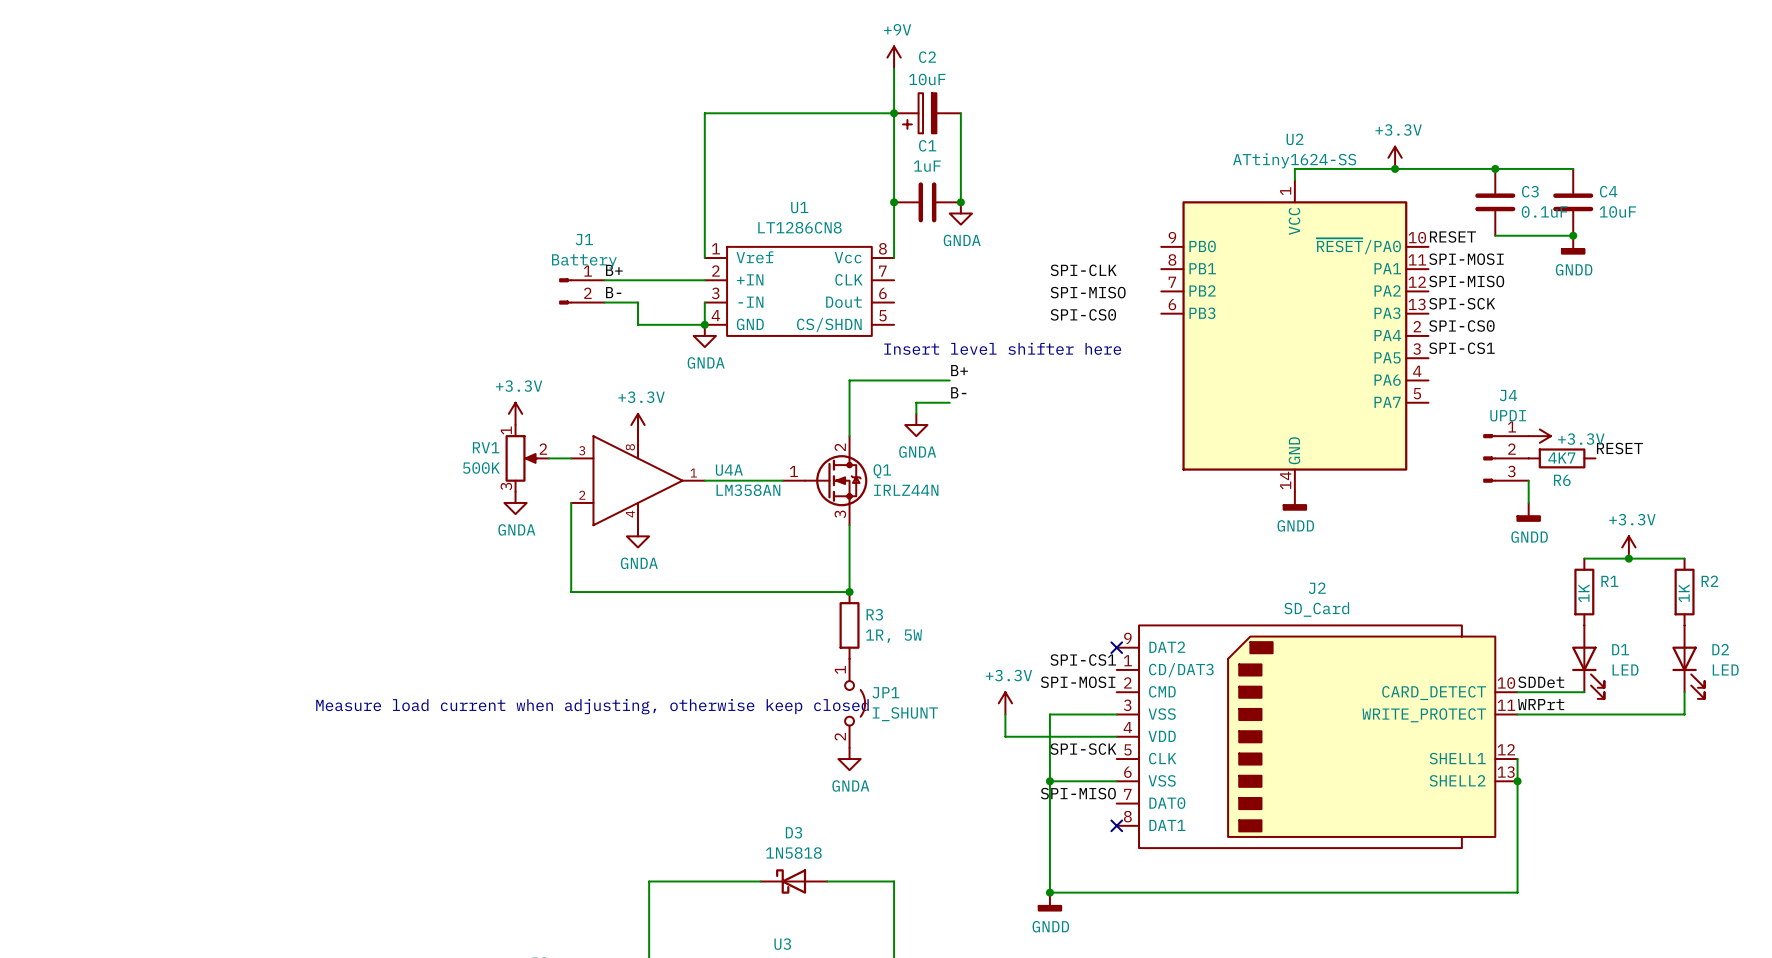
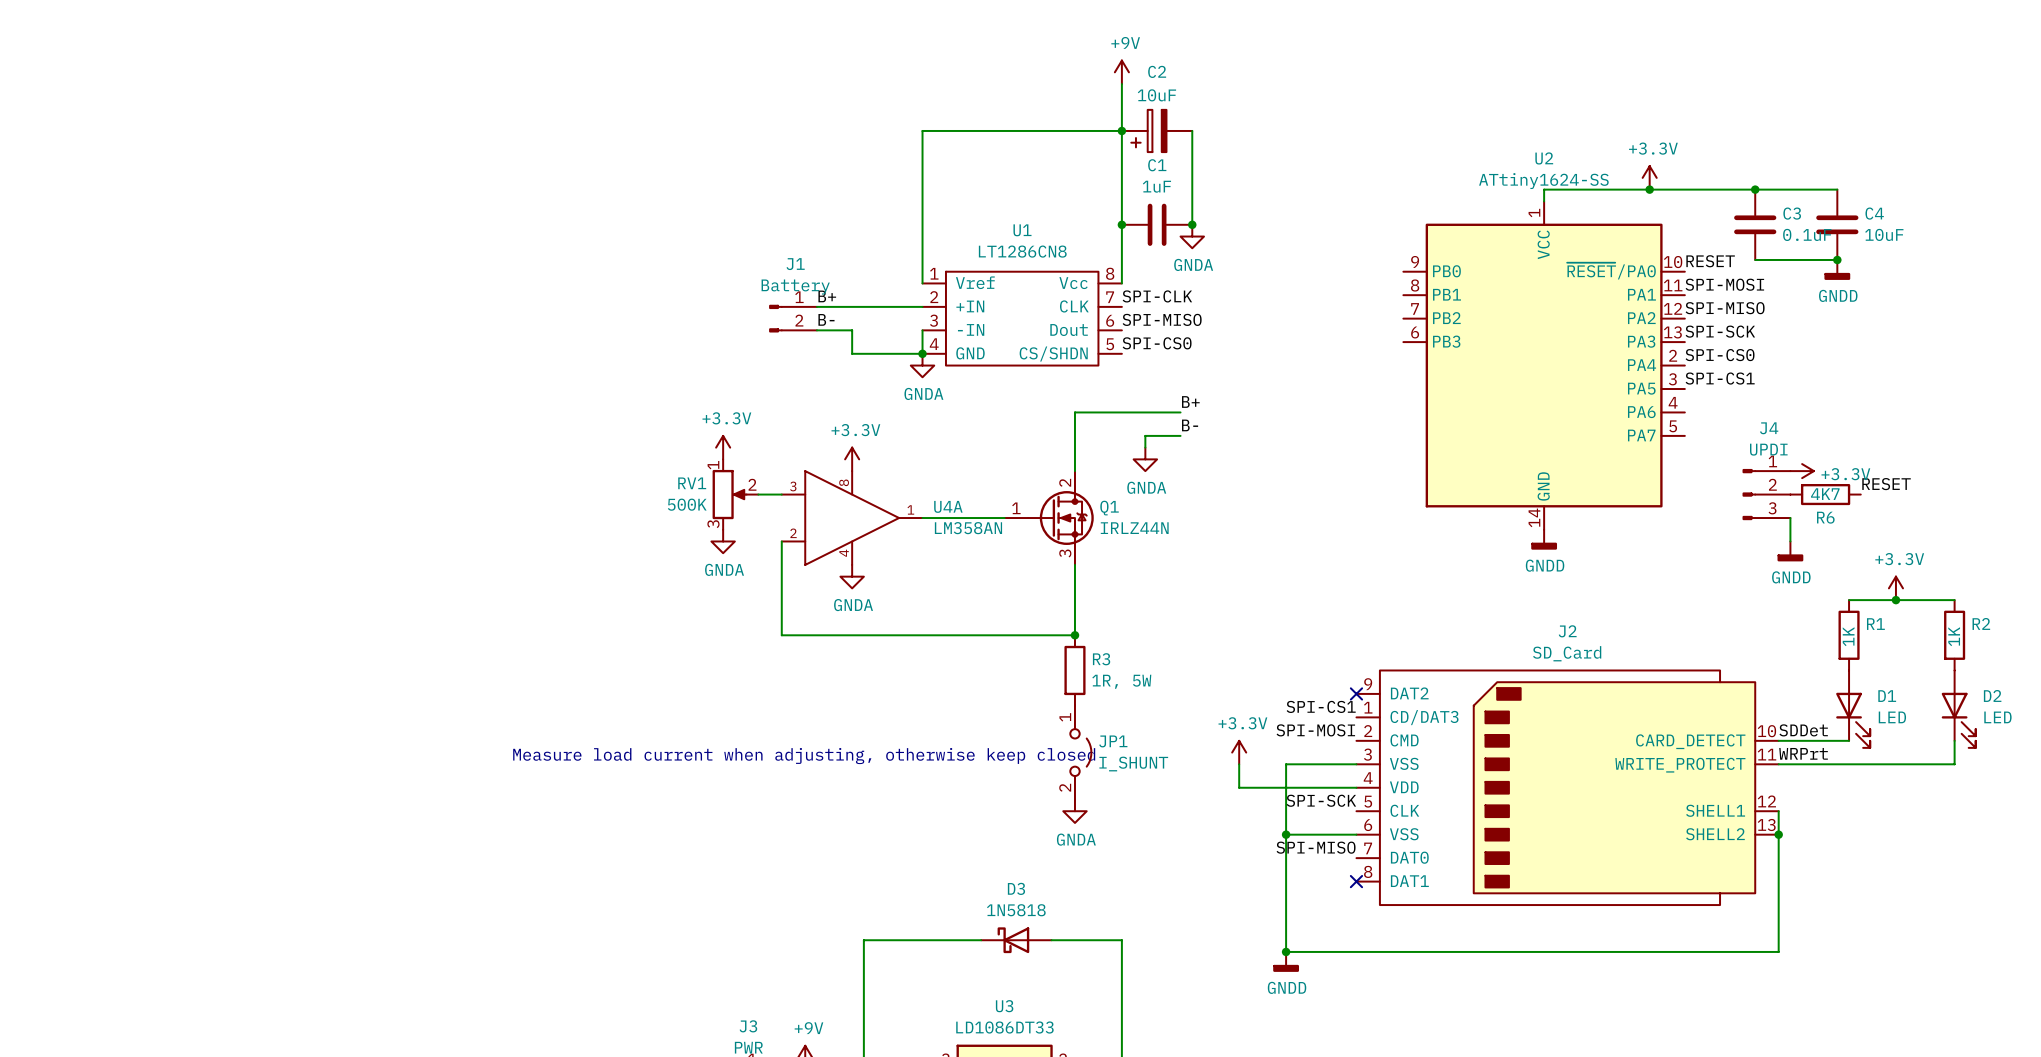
label position: SPI-CLK (1083, 270) -> SPI-CLK (1157, 296)
label position: SPI-MISO (1088, 292) -> SPI-MISO (1162, 319)
label position: SPI-CS0 (1083, 314) -> SPI-CS0 (1157, 343)
text: Insert level shifter here (1002, 348) -> none

